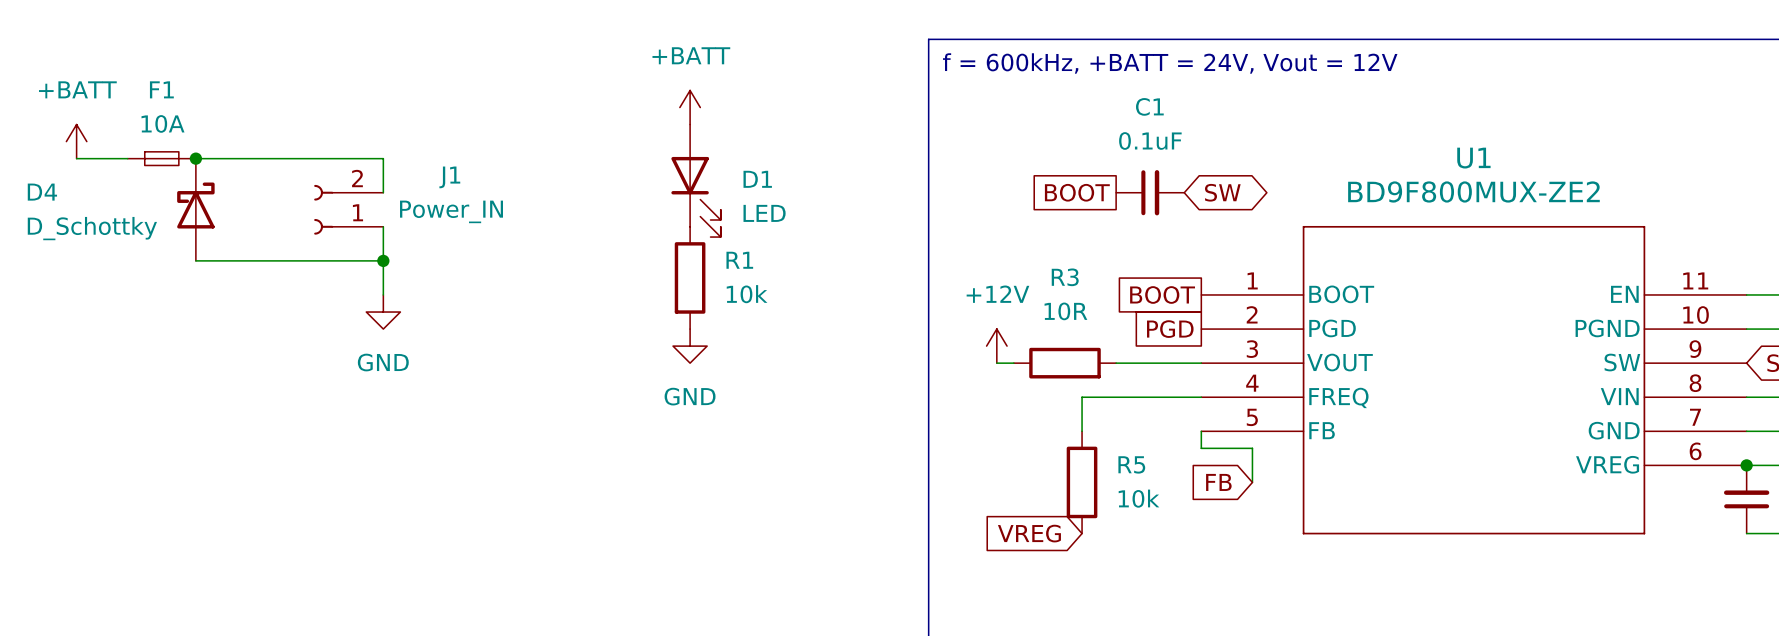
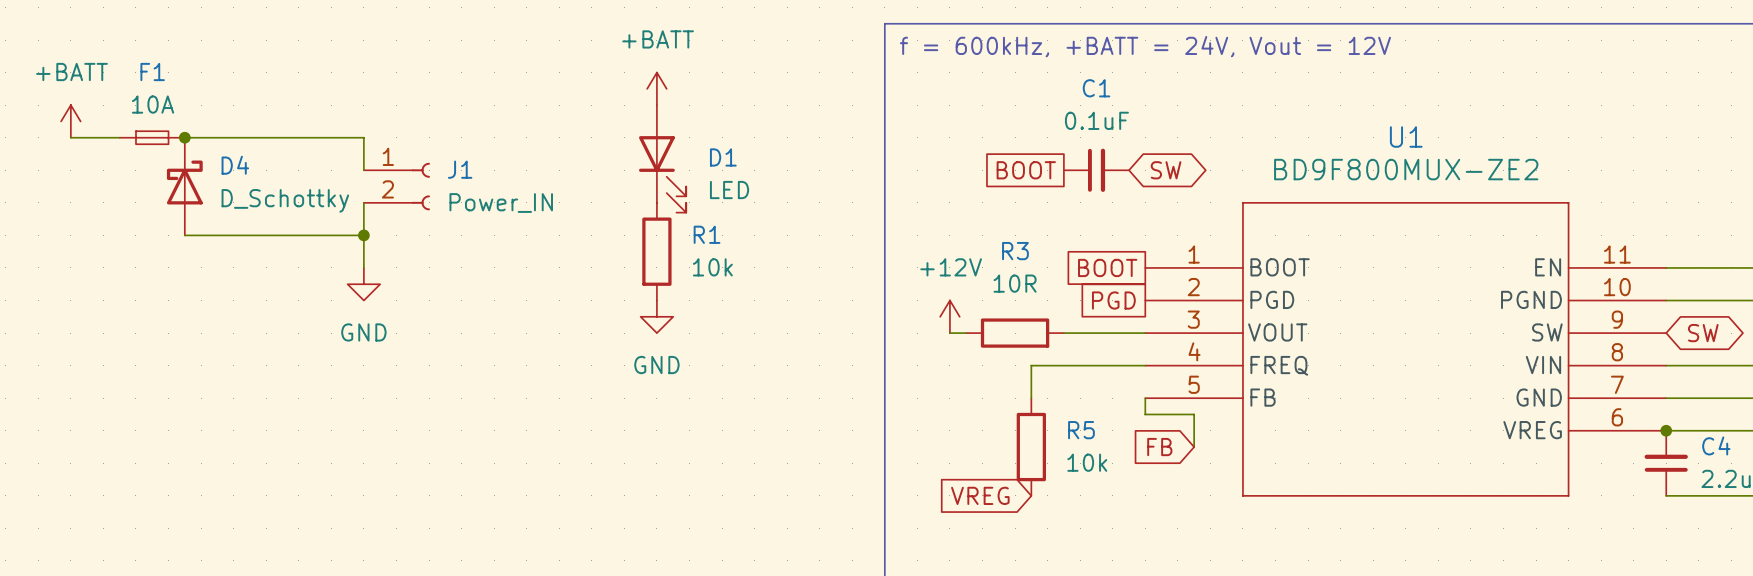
J1 name position: J1 (449, 177) -> J1 (460, 169)
D4 name position: D4 (42, 192) -> D4 (235, 165)
J1 rotation: 0° (323, 209) -> 180° (420, 186)
J1 position: (348, 209) -> (396, 186)
D4 value position: D_Schottky (92, 228) -> D_Schottky (285, 200)

